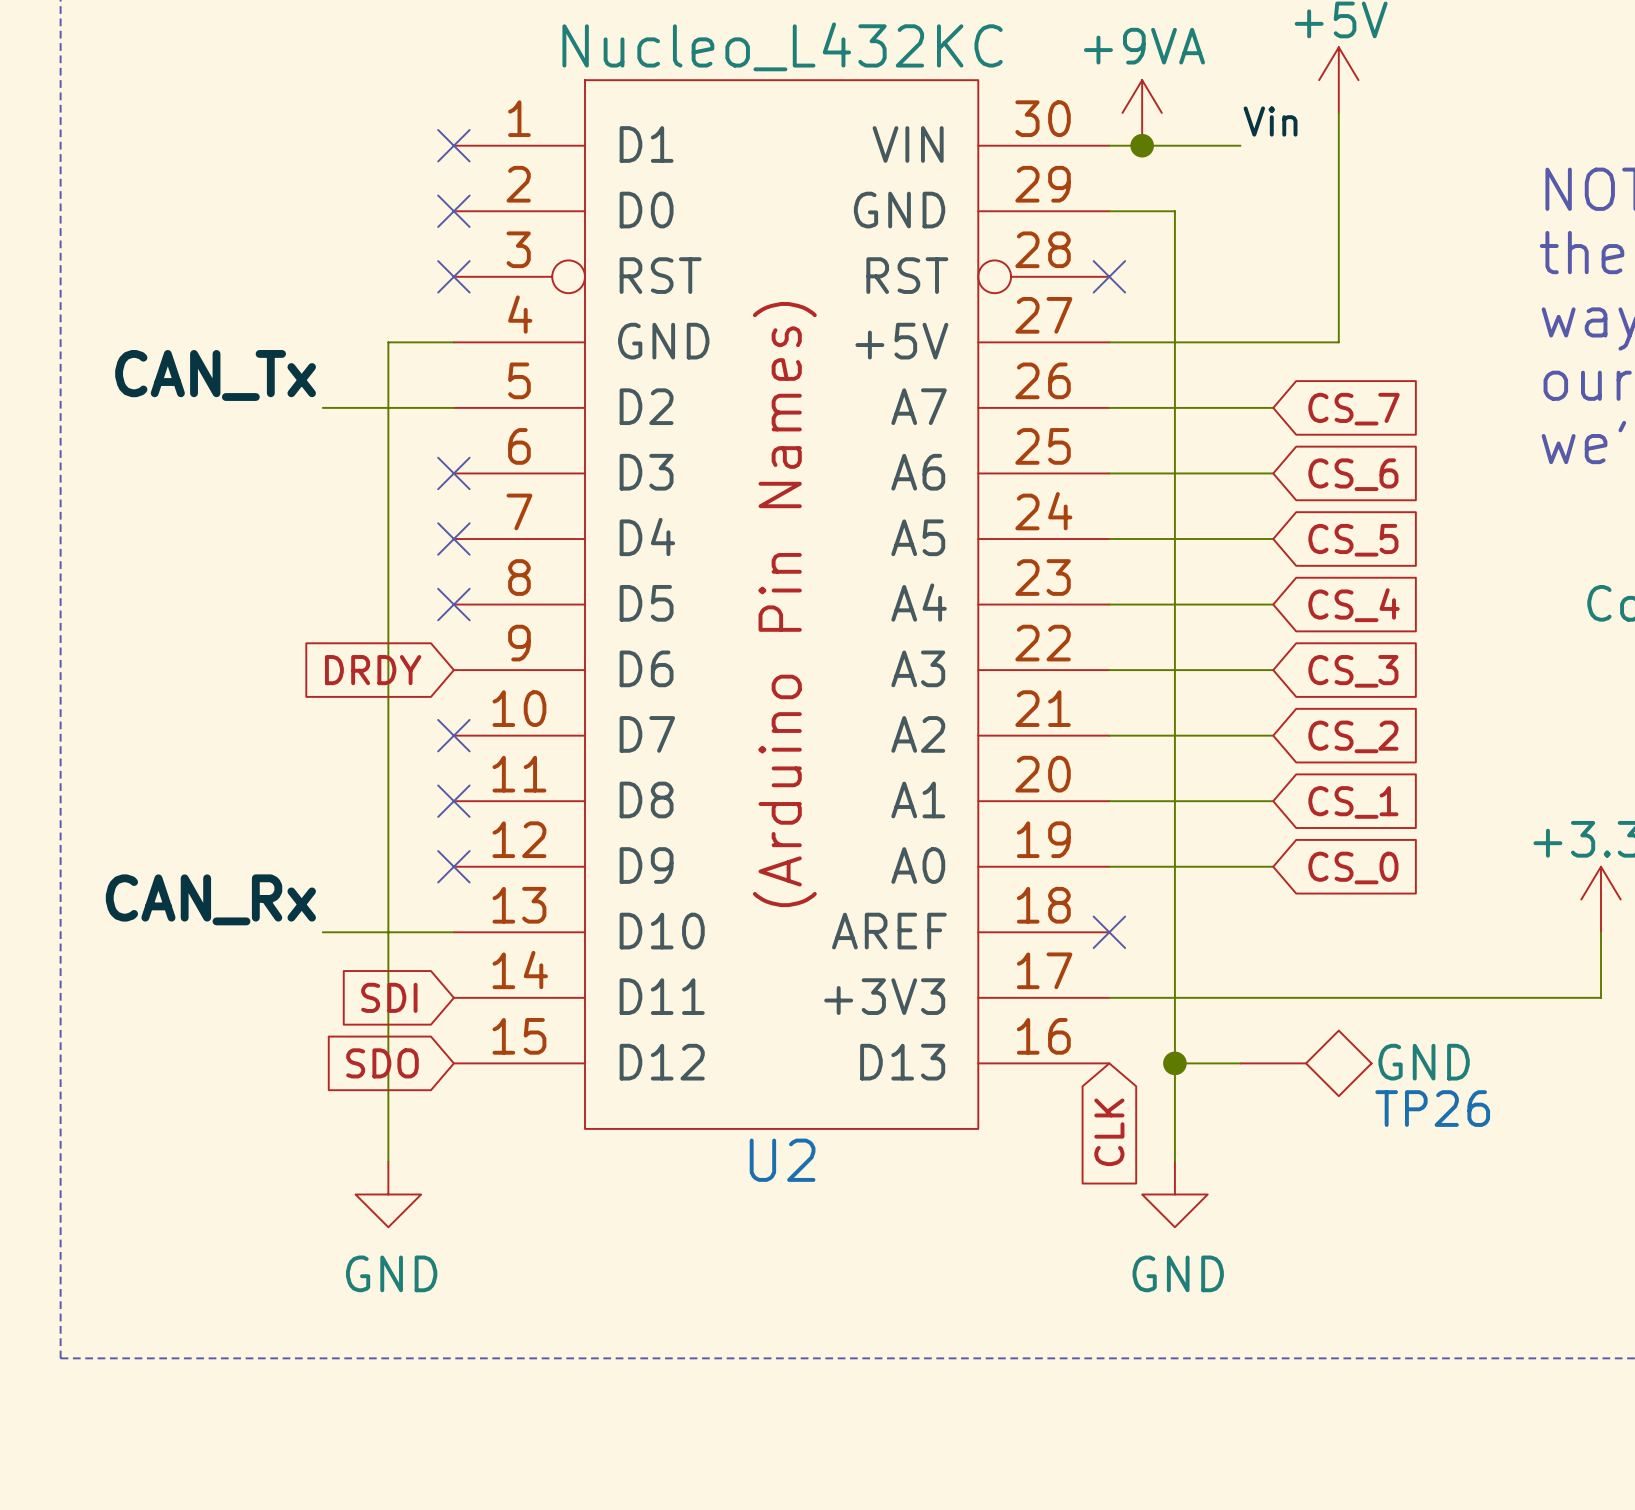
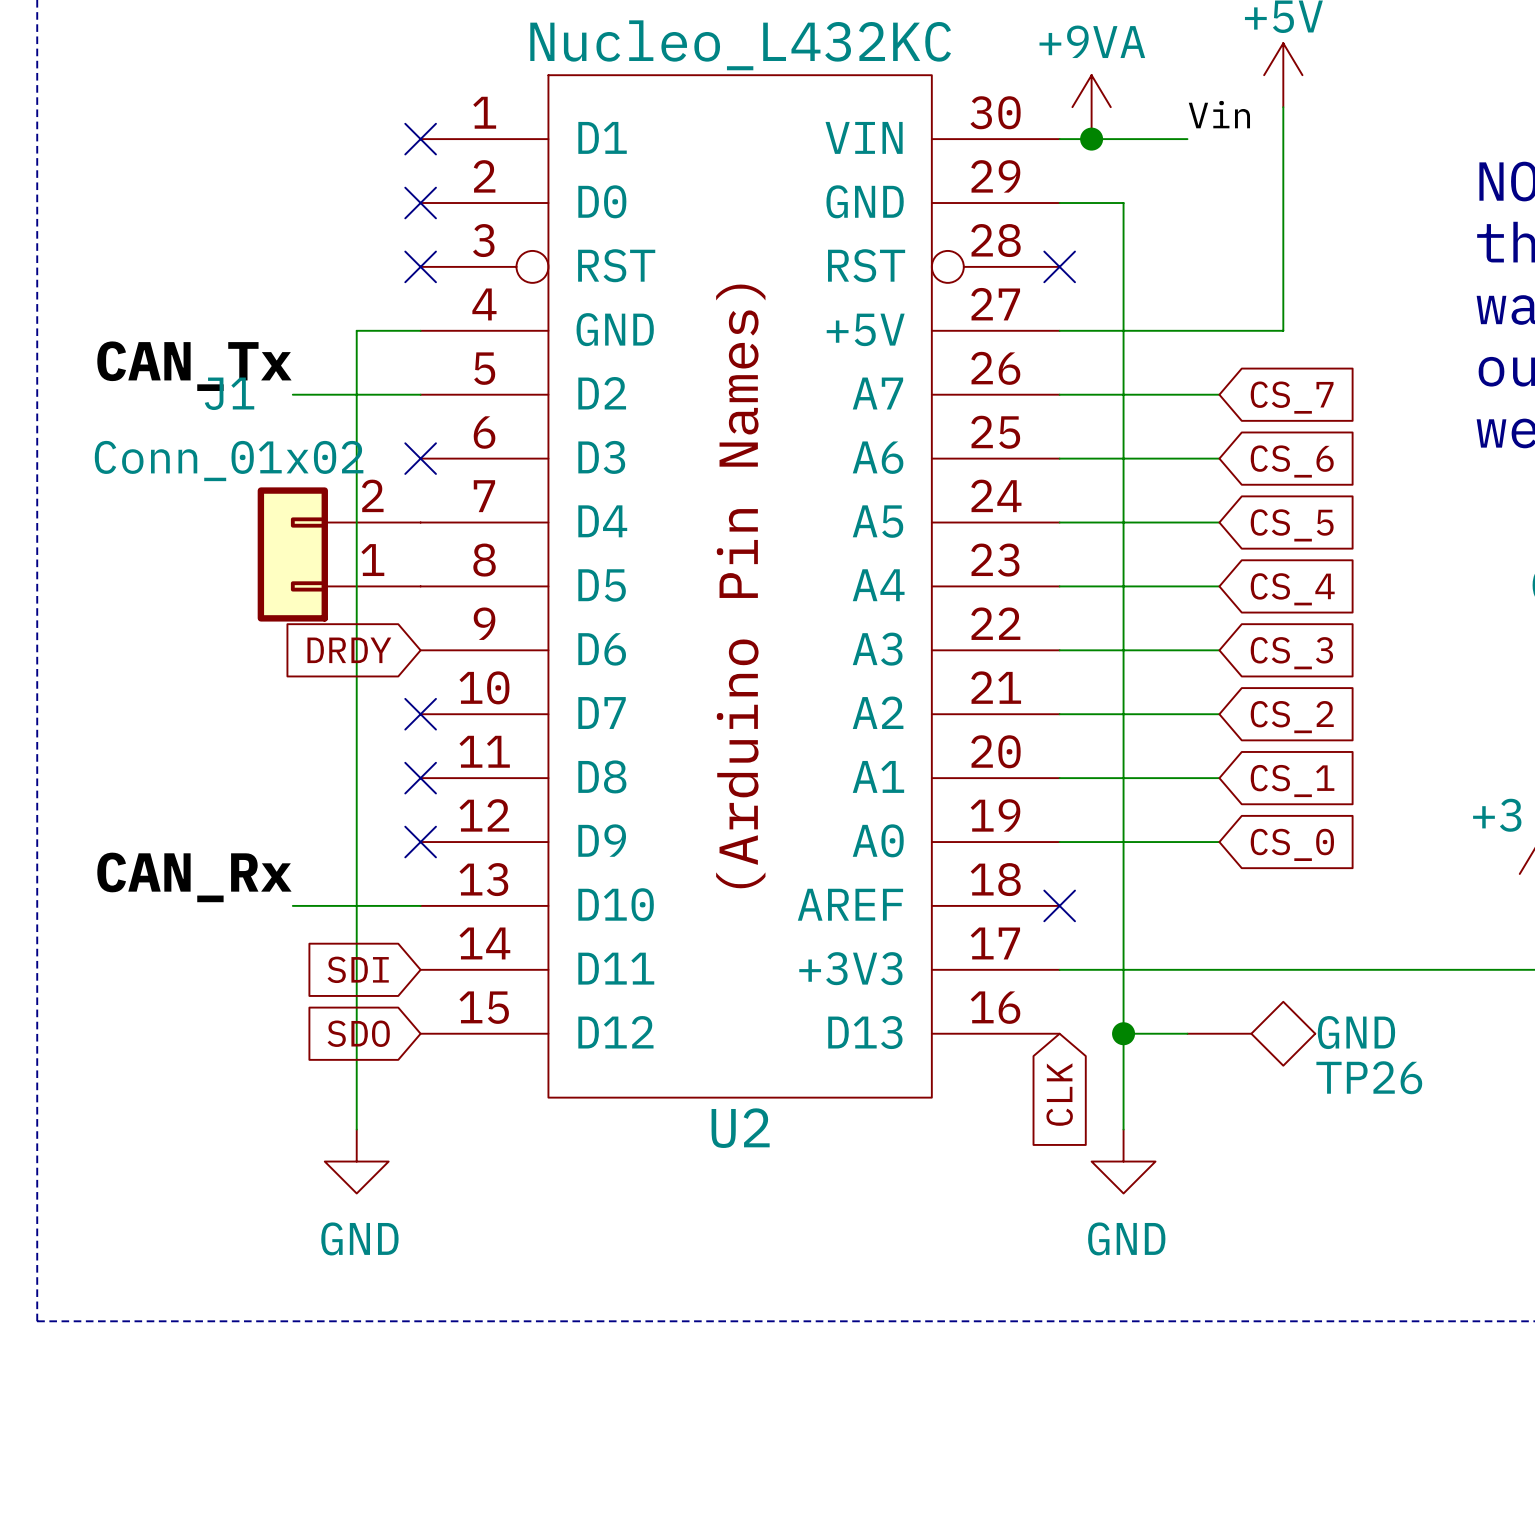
no-connect mark: (453, 539) -> none
J1: none -> Conn_01x02 (339, 554)
no-connect mark: (453, 604) -> none

